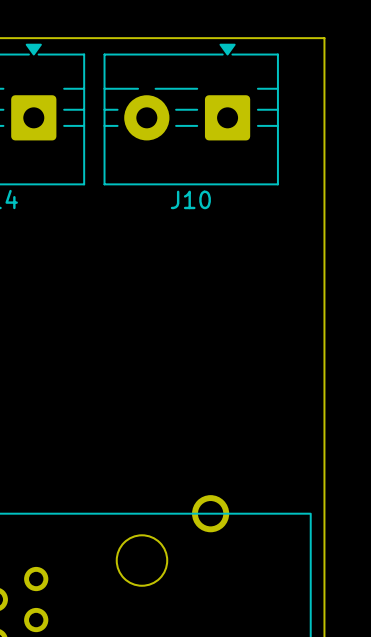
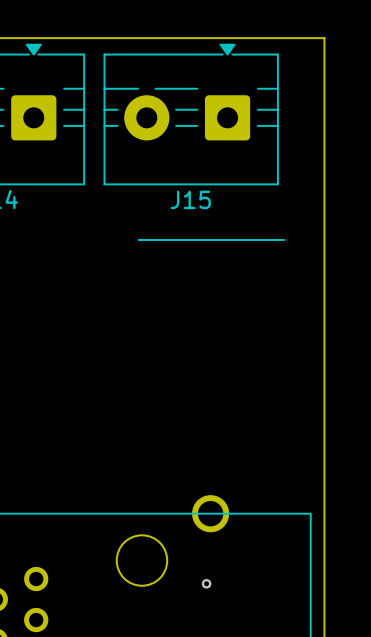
J10 name: J10 (190, 199) -> J15 (190, 199)
line: none -> (138, 239) (284, 239)
via: none -> (206, 583)

